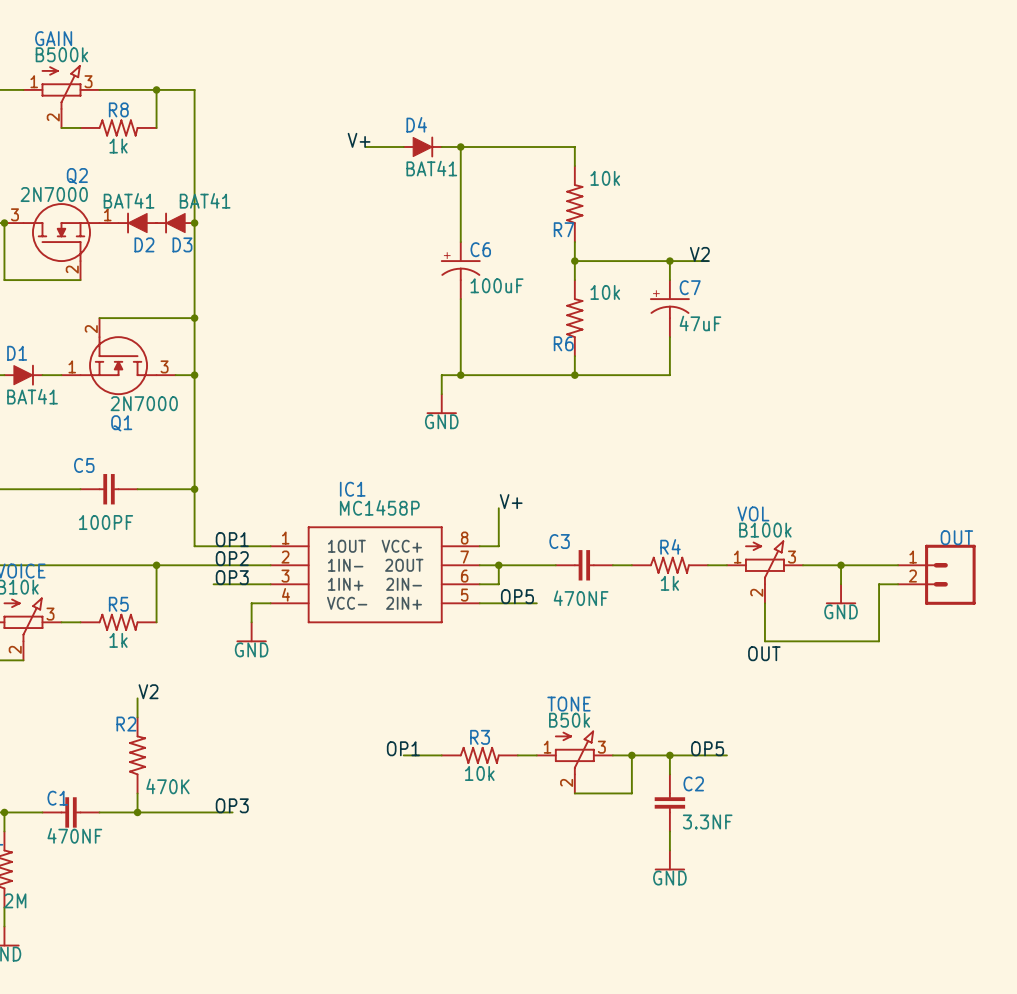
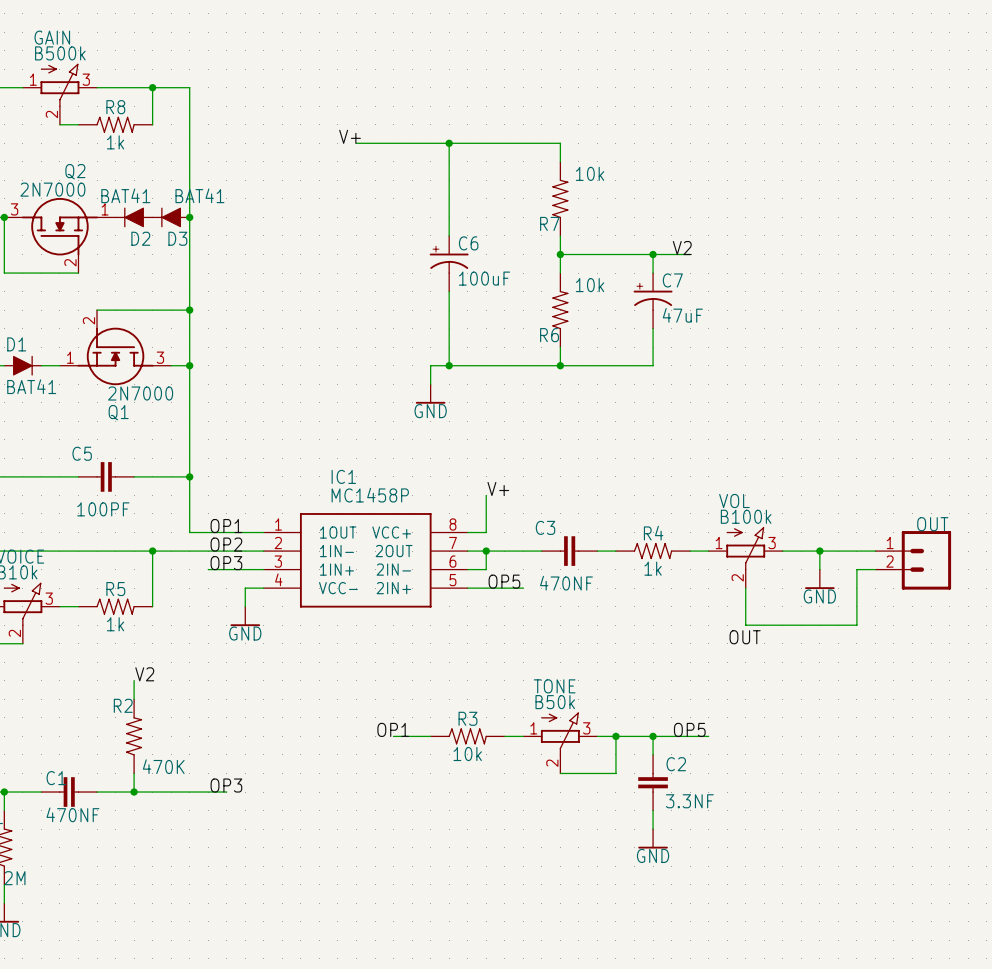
D4: BAT41 (422, 147) -> none

